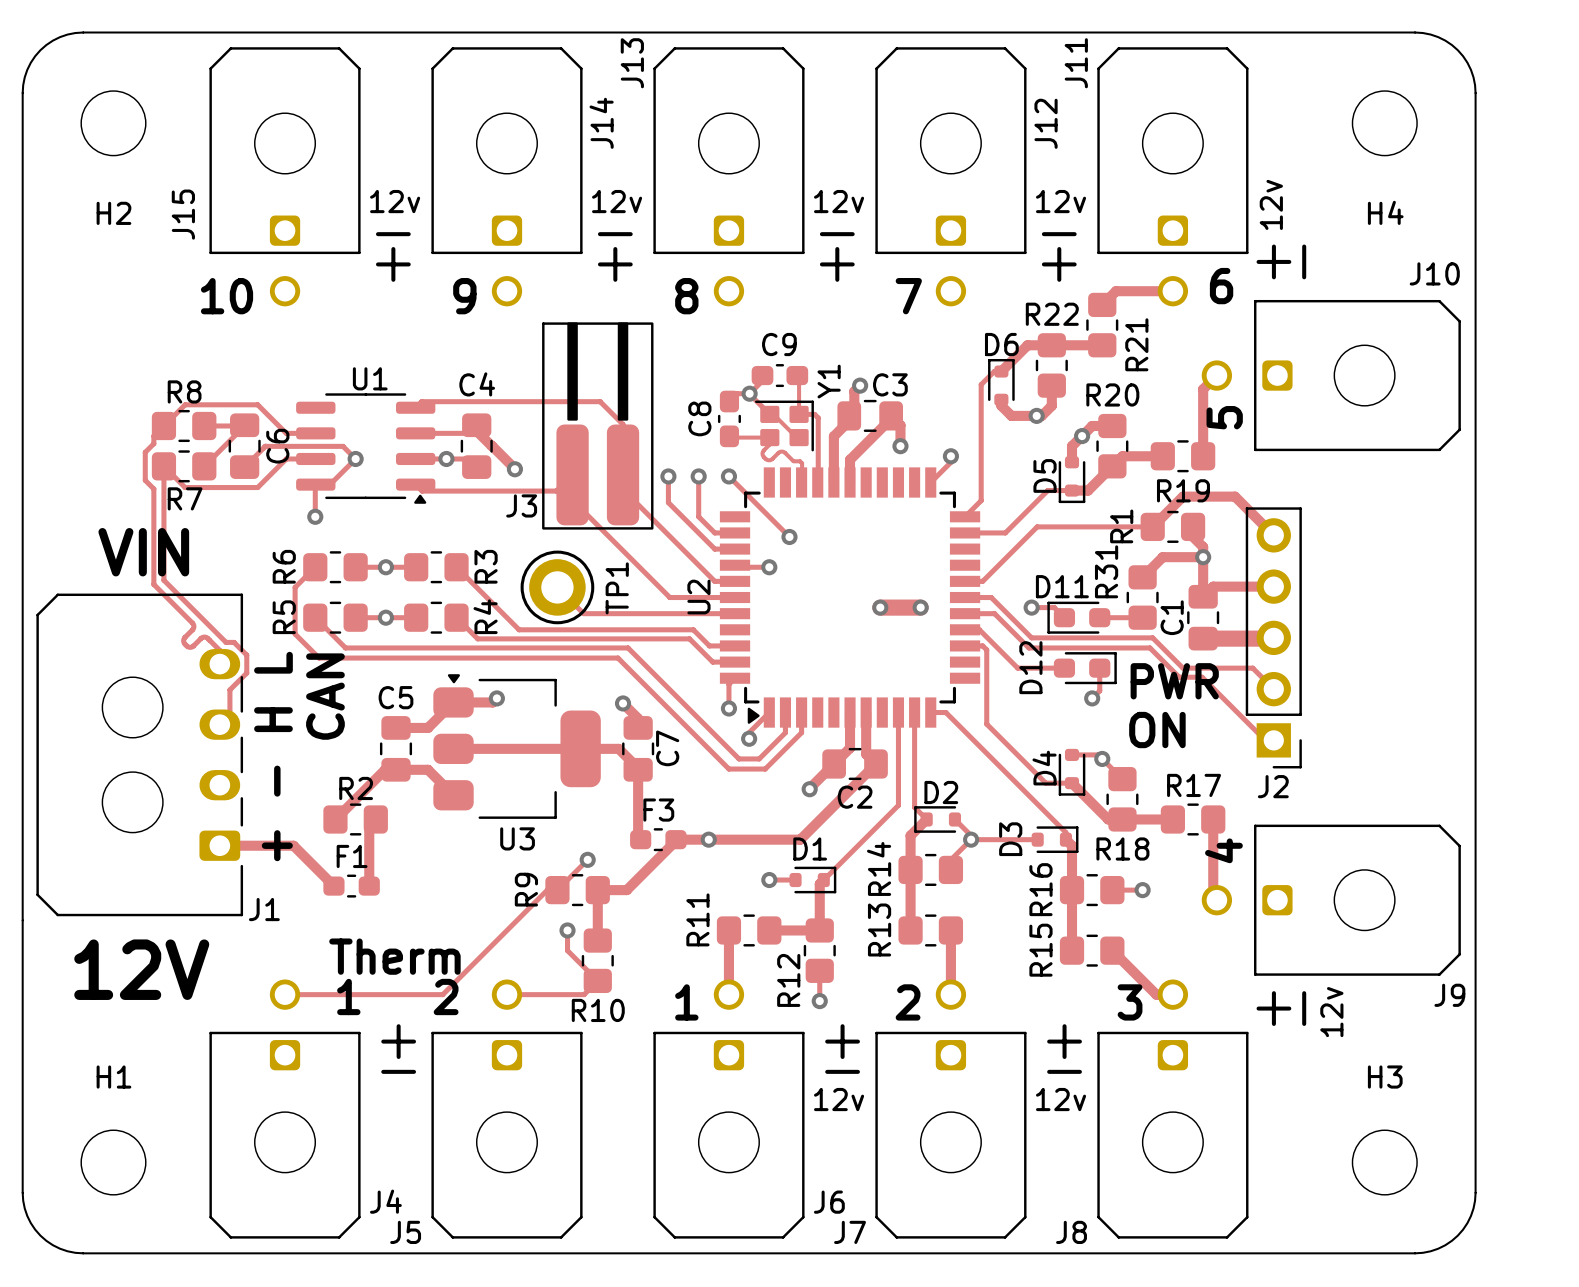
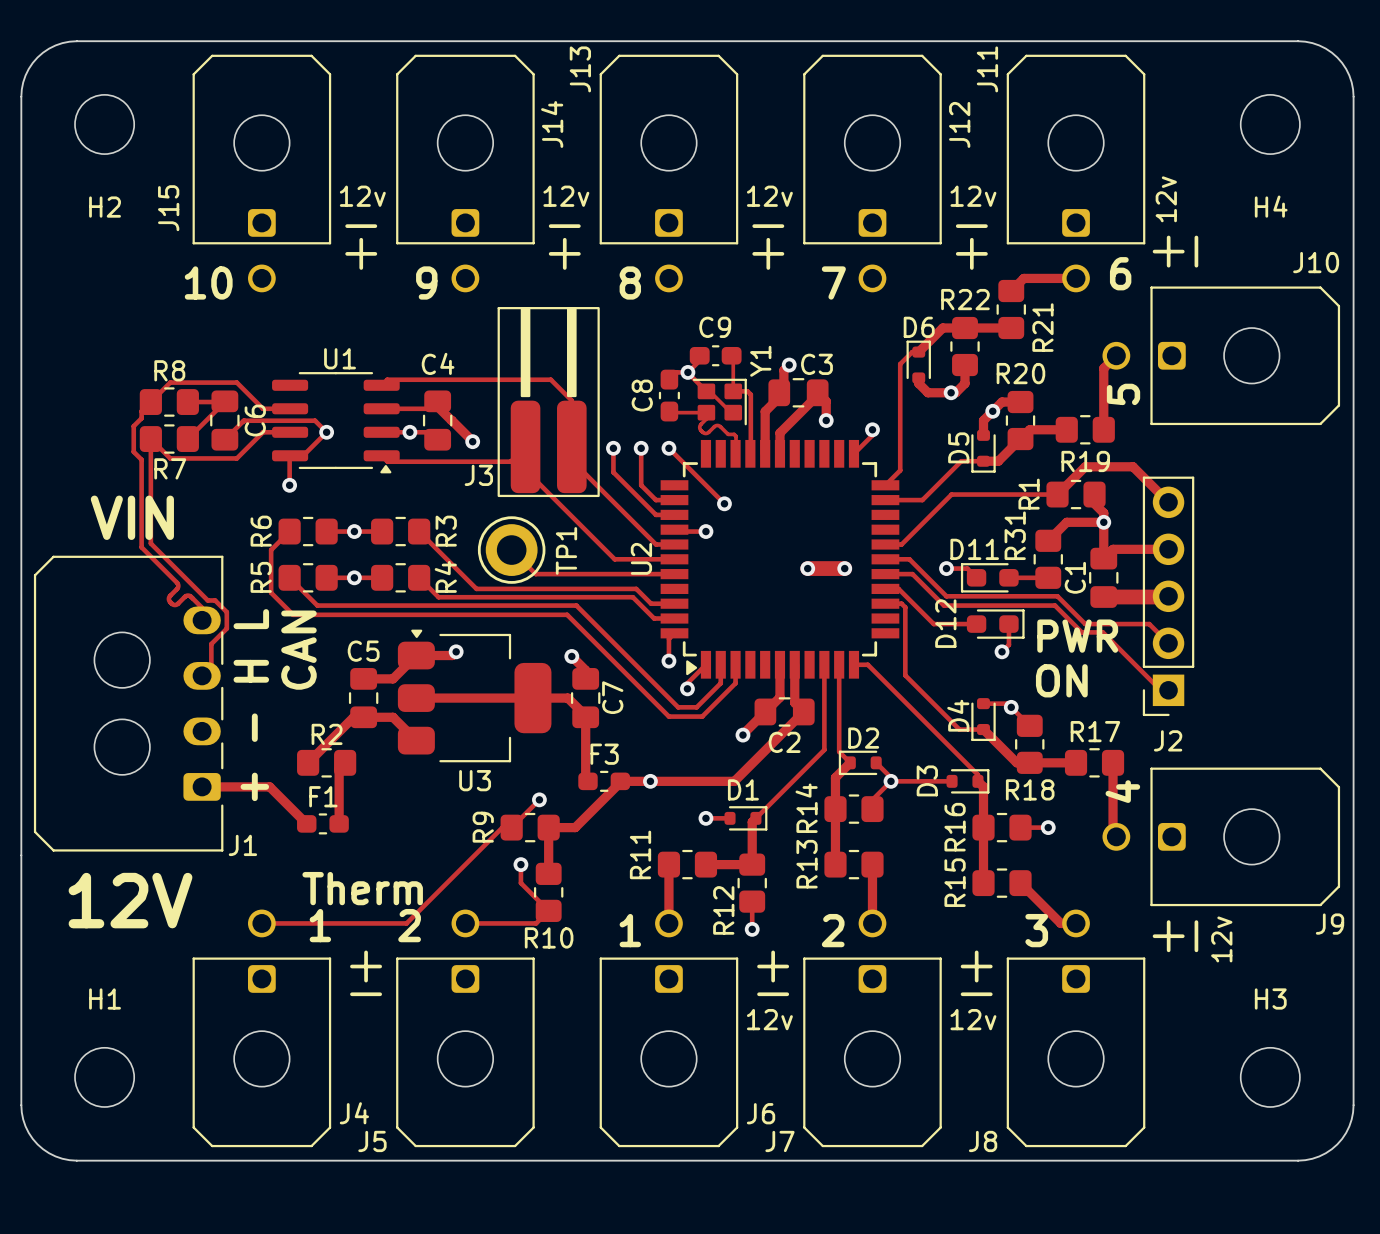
J2 footprint: [1245, 507, 1302, 769] -> [1142, 476, 1195, 717]

